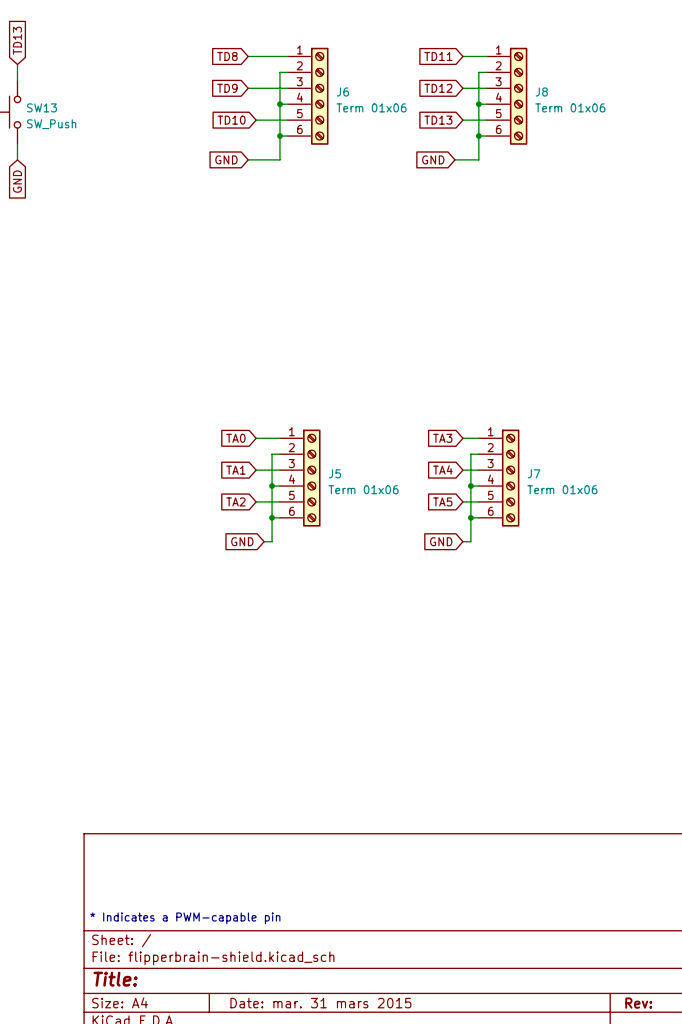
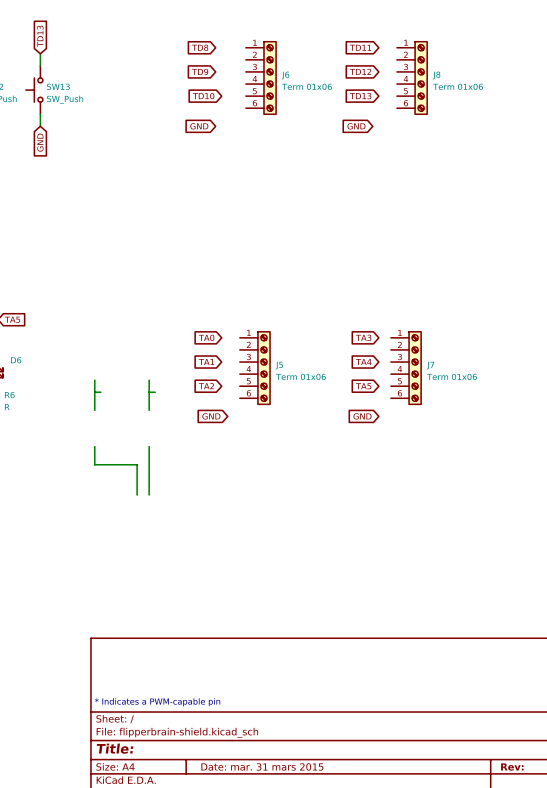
wire: (248, 56) (287, 56) -> none
wire: (462, 56) (486, 56) -> none
wire: (287, 72) (279, 72) (279, 159) (248, 159) -> none
wire: (486, 72) (478, 72) (478, 159) (454, 159) -> none
wire: (248, 88) (287, 88) -> none
wire: (462, 88) (486, 88) -> none
wire: (279, 104) (287, 104) -> none
junction: (279, 104) -> none
wire: (478, 104) (486, 104) -> none
junction: (478, 104) -> none
wire: (256, 120) (287, 120) -> none
wire: (462, 120) (486, 120) -> none
wire: (279, 136) (287, 136) -> none
junction: (279, 136) -> none
wire: (478, 136) (486, 136) -> none
junction: (478, 136) -> none
wire: (256, 438) (279, 438) -> none
wire: (462, 438) (478, 438) -> none
wire: (279, 454) (272, 454) (272, 541) (264, 541) -> none
wire: (478, 454) (470, 454) (470, 541) (462, 541) -> none
wire: (256, 470) (279, 470) -> none
wire: (462, 470) (478, 470) -> none
wire: (272, 486) (279, 486) -> none
junction: (272, 486) -> none
wire: (470, 486) (478, 486) -> none
junction: (470, 486) -> none
wire: none -> (94, 380) (94, 410)
wire: none -> (149, 380) (149, 410)
wire: (256, 501) (279, 501) -> none
wire: (462, 501) (478, 501) -> none
wire: none -> (94, 392) (100, 392)
wire: (272, 517) (279, 517) -> (149, 392) (155, 392)
junction: (272, 517) -> none
wire: (470, 517) (478, 517) -> none
junction: (470, 517) -> none
wire: none -> (94, 446) (94, 464) (137, 464) (137, 494)
wire: none -> (149, 446) (149, 494)

